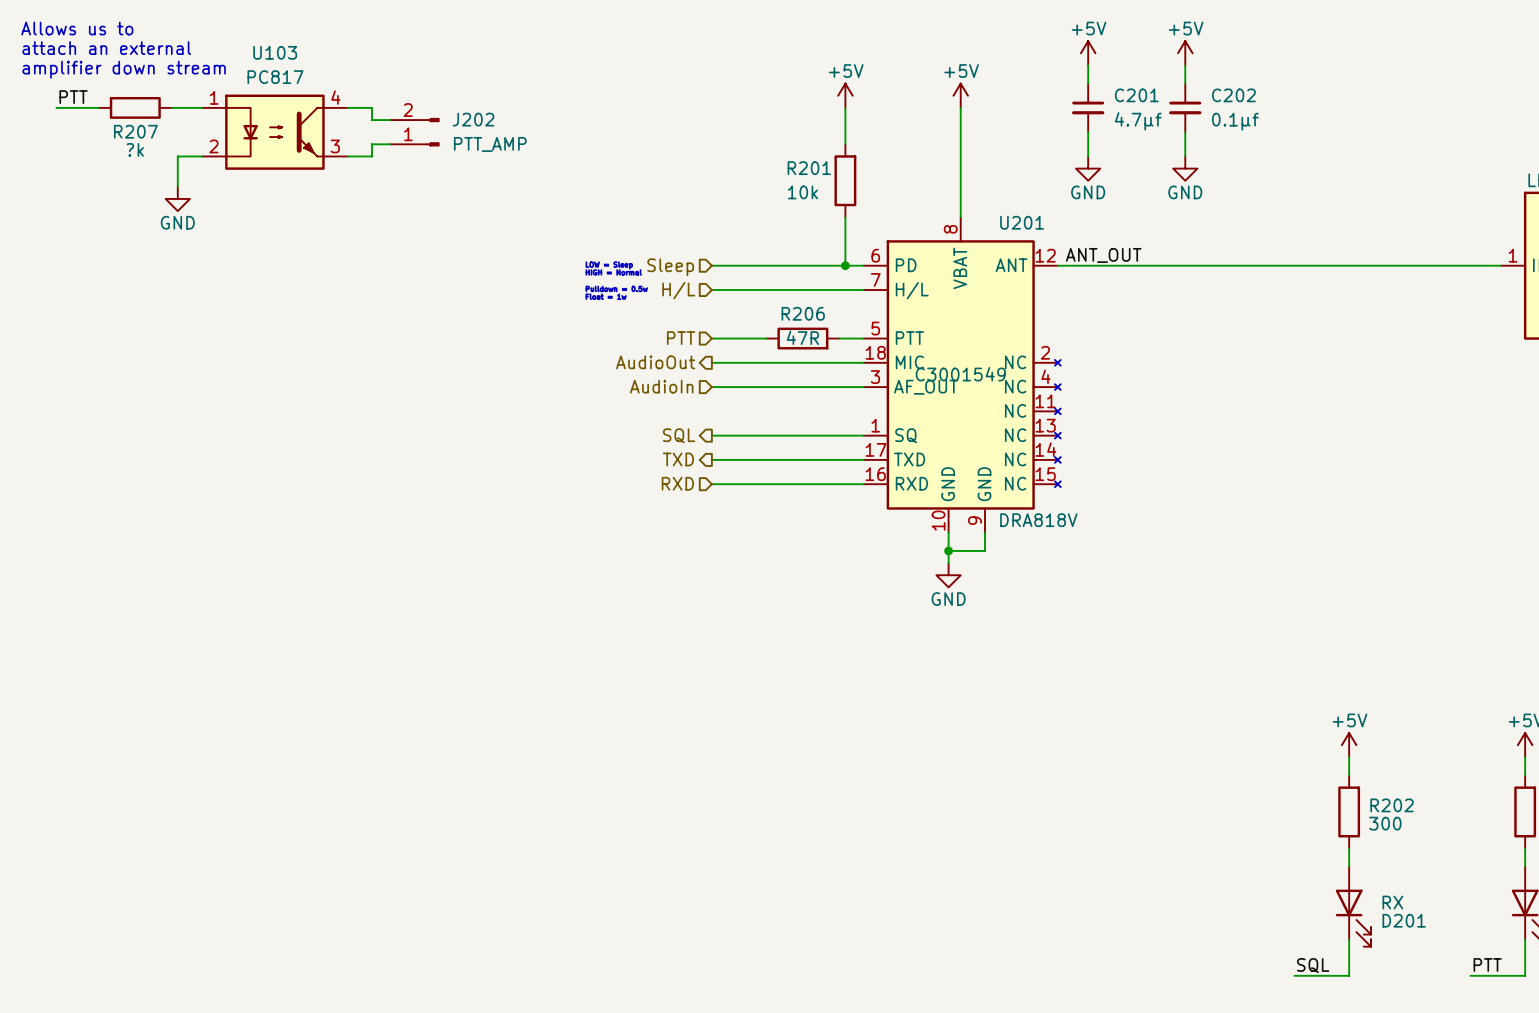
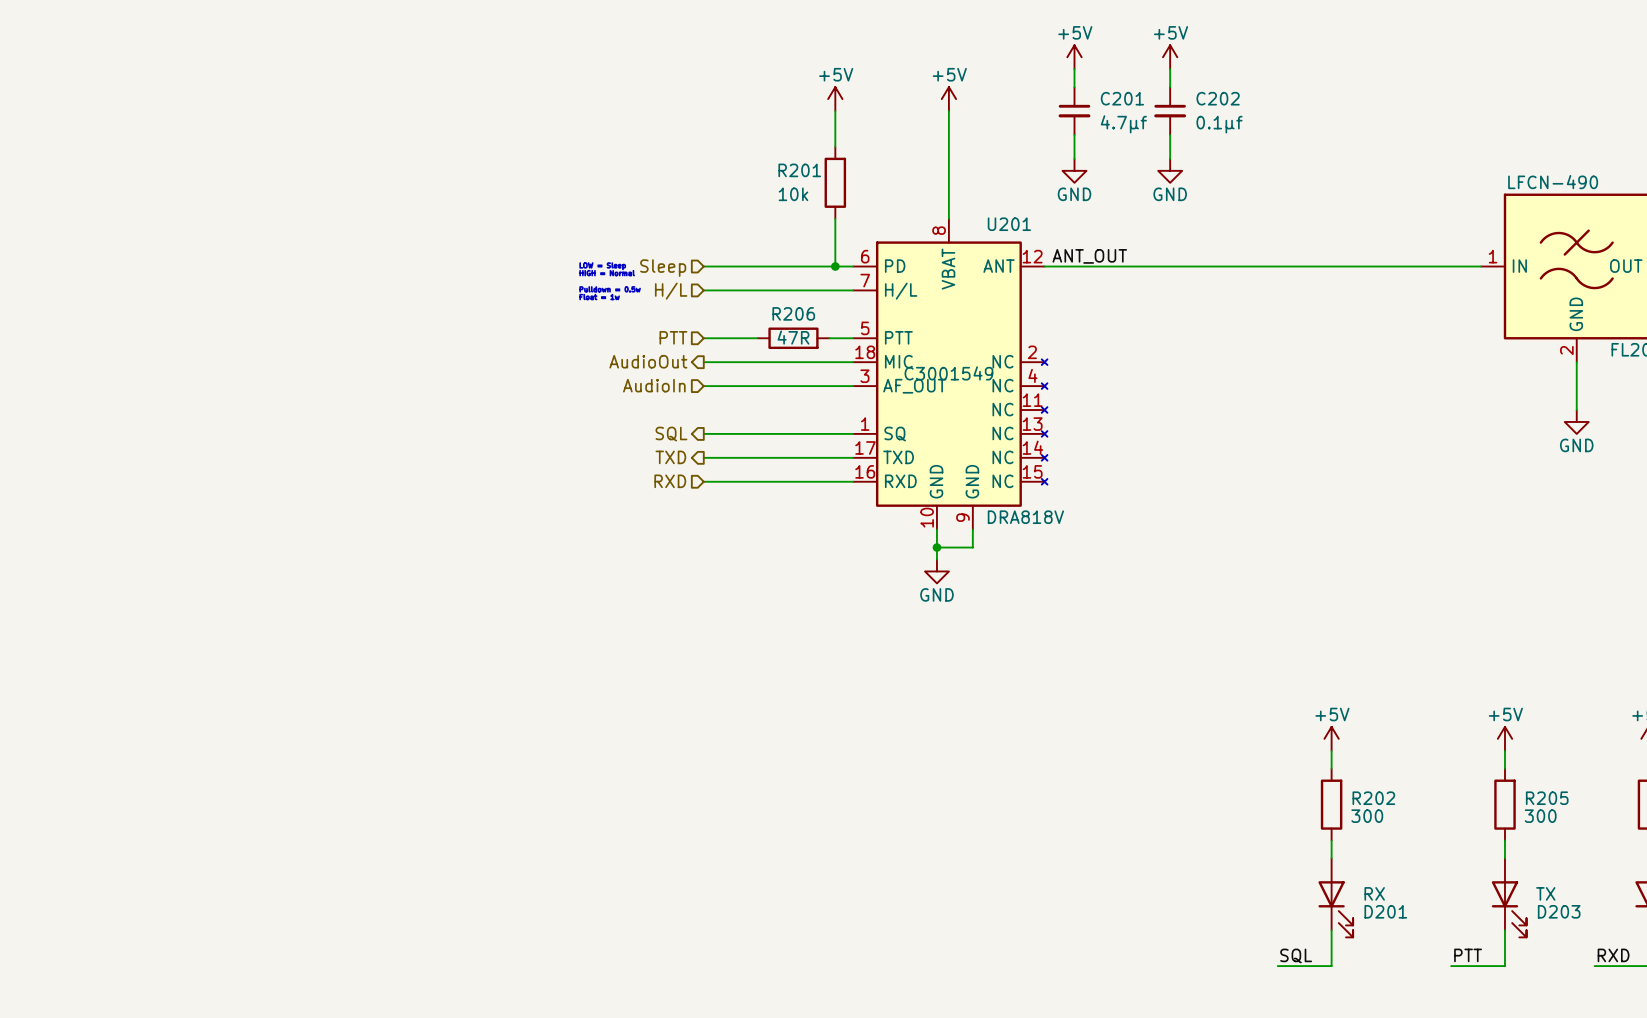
text: Allows us to (77, 28) -> none
text: attach an external (106, 48) -> none
text: amplifier down stream (124, 69) -> none
label: PTT (73, 97) -> none
wire: (56, 107) (98, 107) -> none
R207: ?k (135, 107) -> none
wire: (171, 107) (202, 107) -> none
wire: (347, 107) (372, 107) (372, 120) (390, 120) -> none
U103: PC817 (274, 132) -> none
J202: PTT_AMP (414, 132) -> none
wire: (390, 144) (372, 144) (372, 156) (347, 156) -> none
wire: (202, 156) (177, 156) (177, 186) -> none
power symbol: GND (177, 198) -> none

